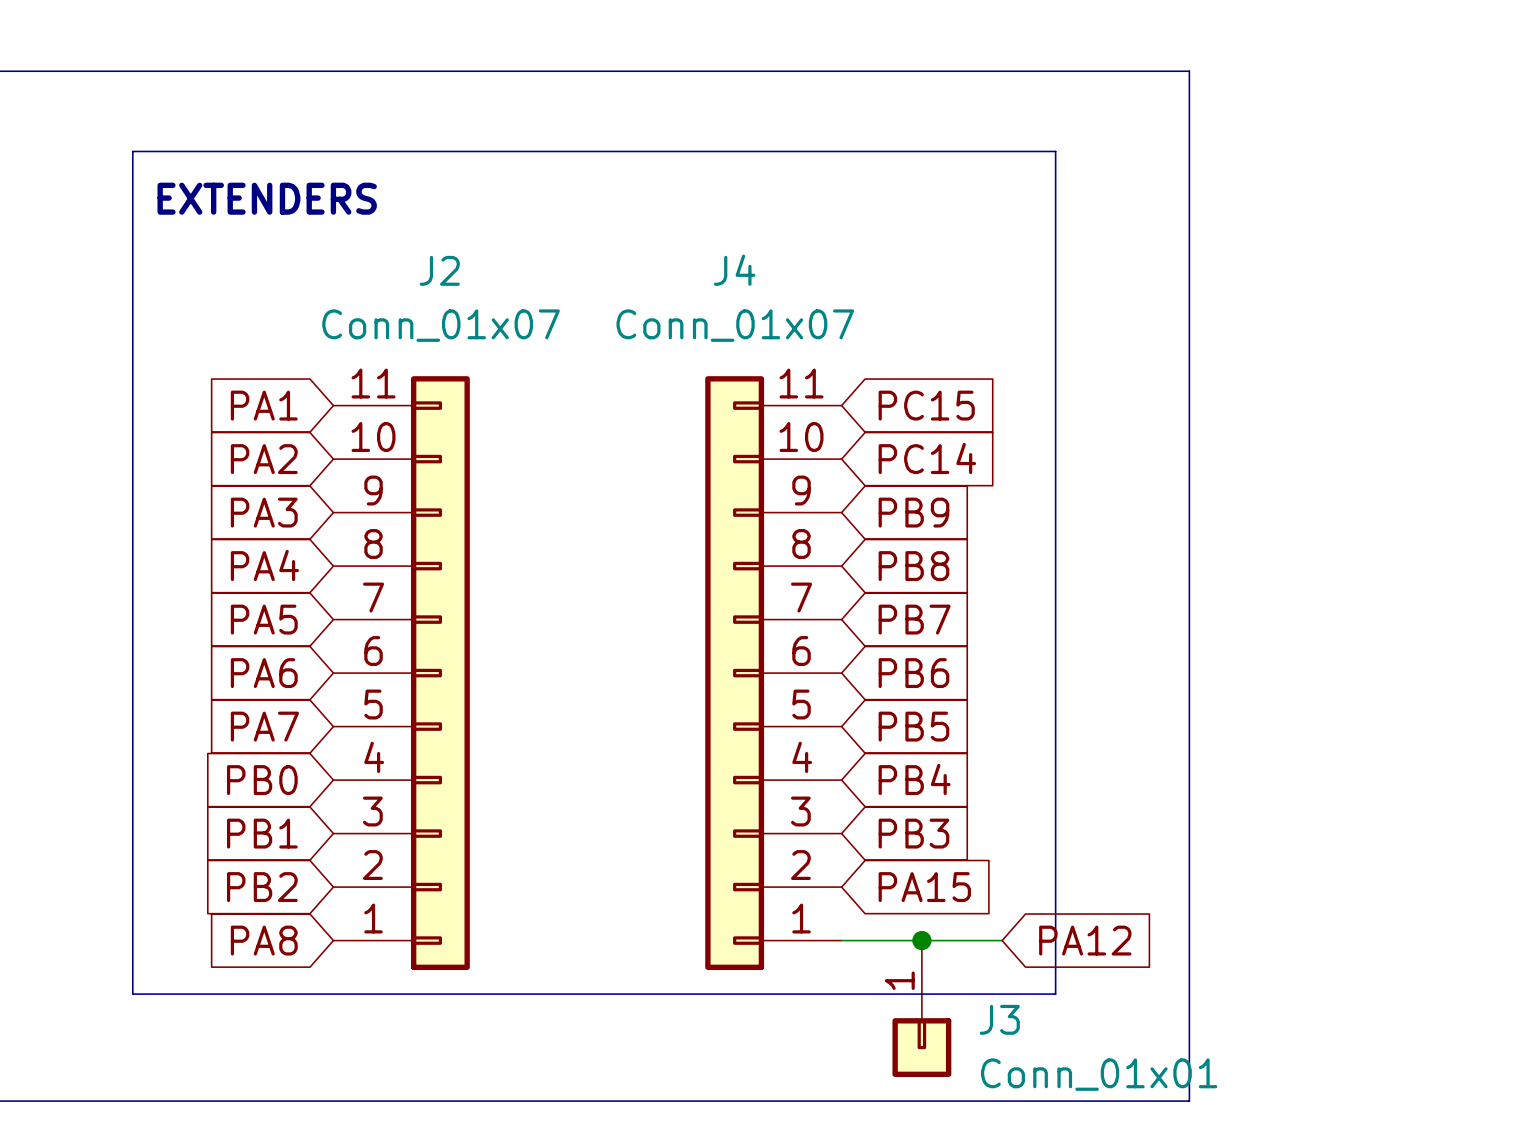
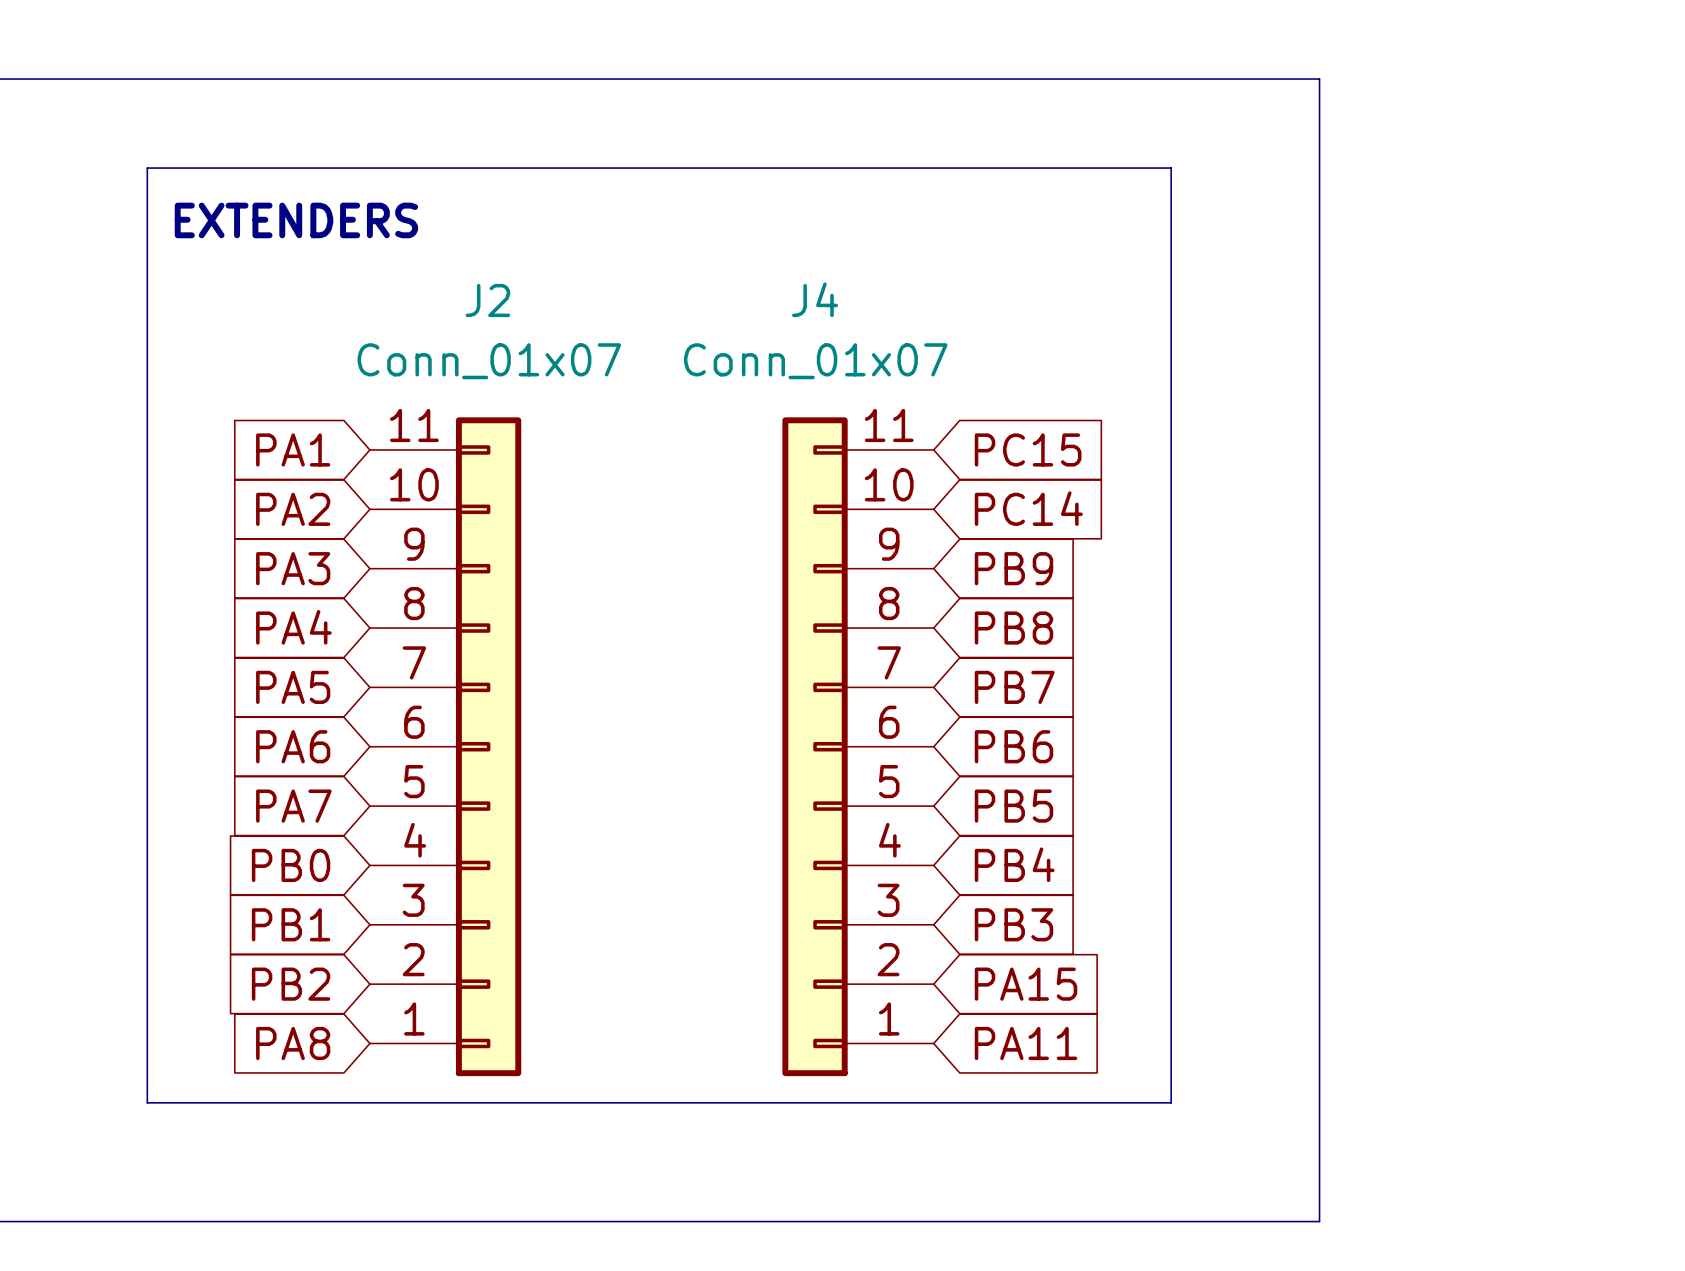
wire: (841, 940) (1002, 940) -> none
junction: (921, 940) -> none
global label: PA12 (1085, 940) -> PA11 (1025, 1043)
J3: Conn_01x01 (921, 1008) -> none

